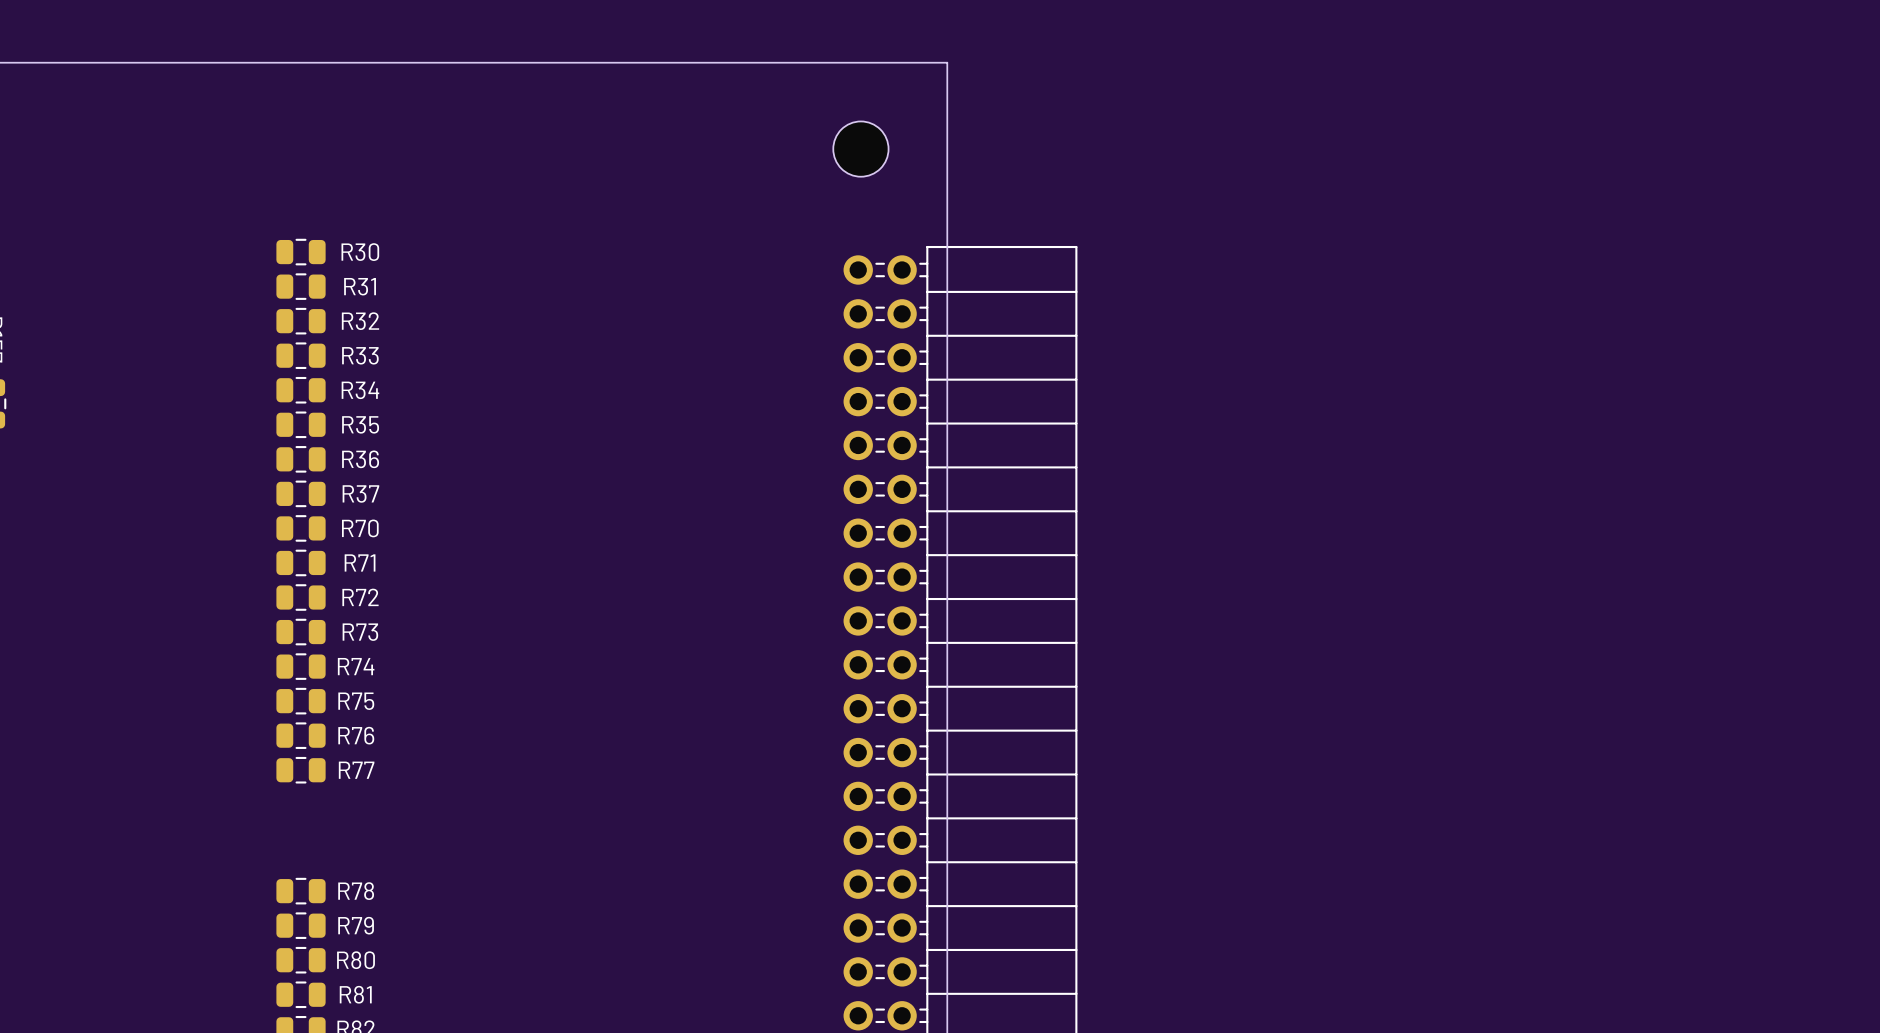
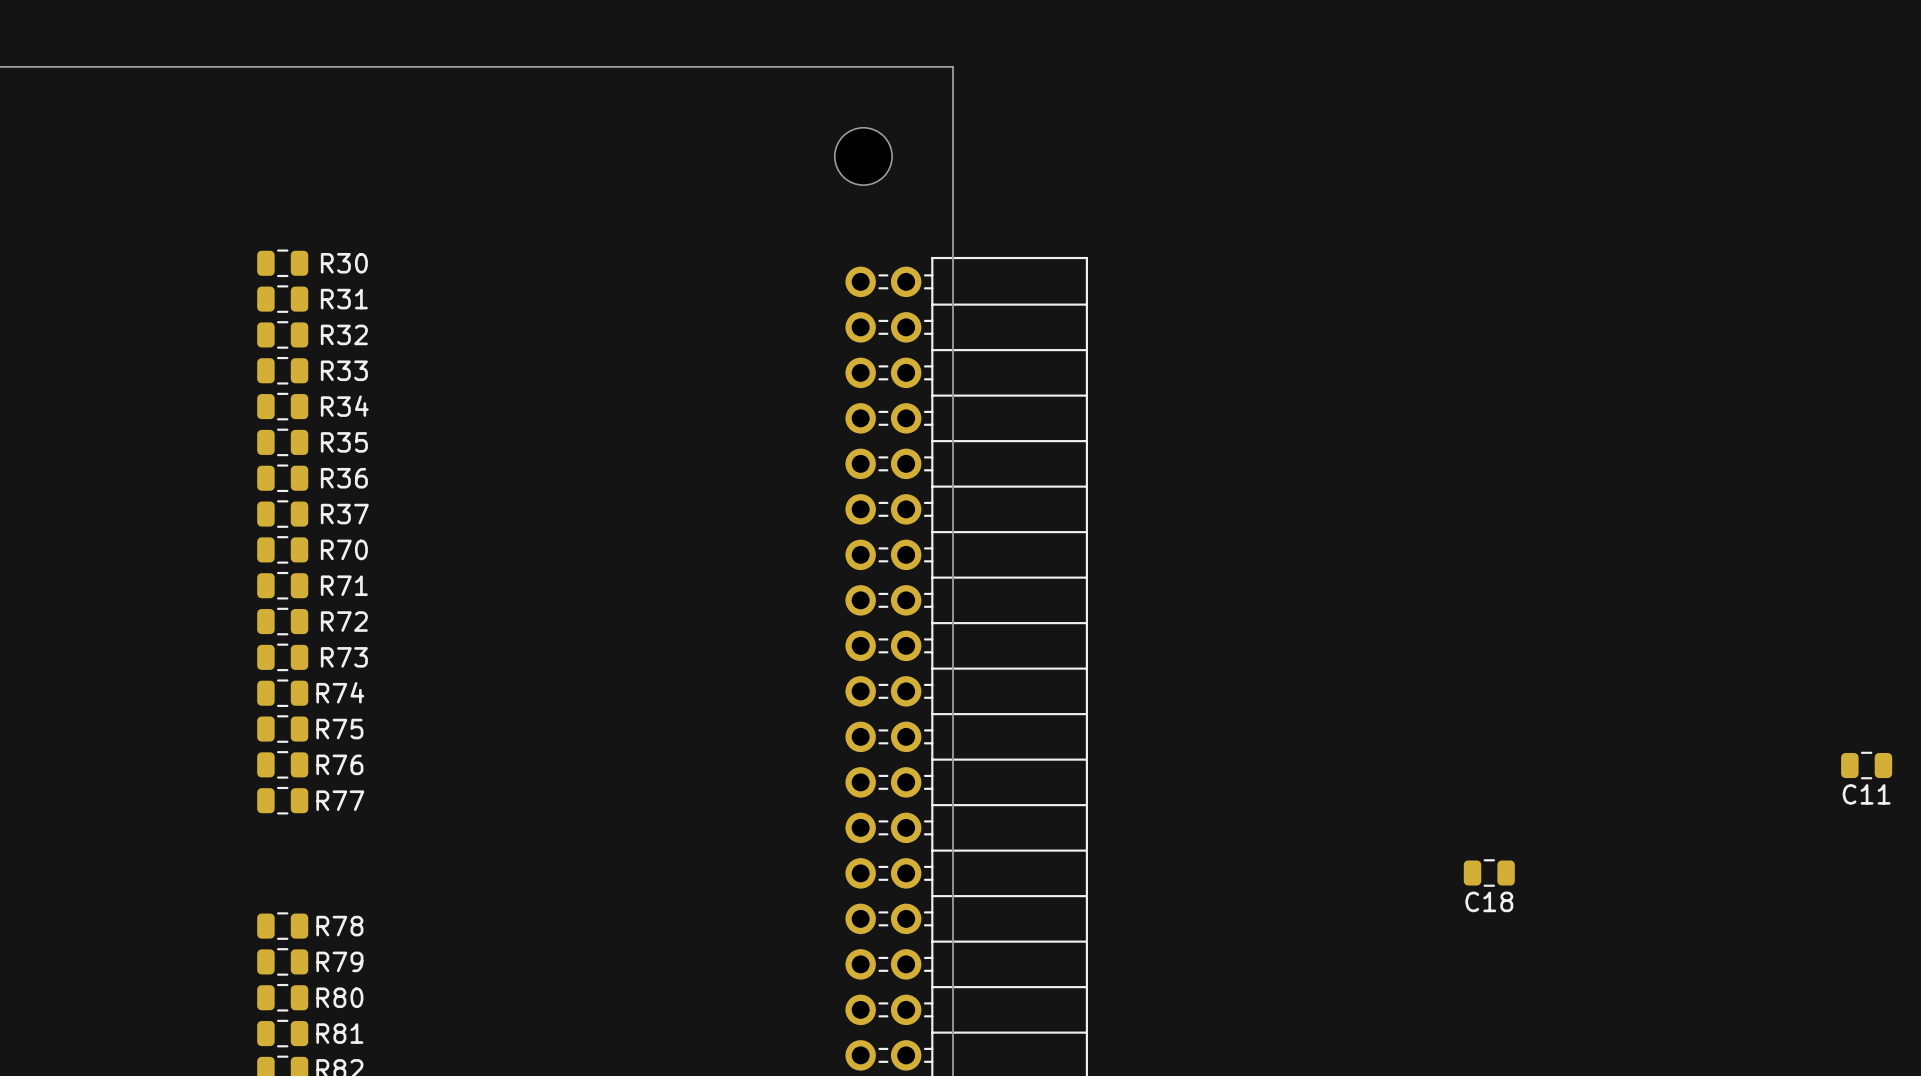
C11: none -> (1866, 765)
C18: none -> (1489, 873)

